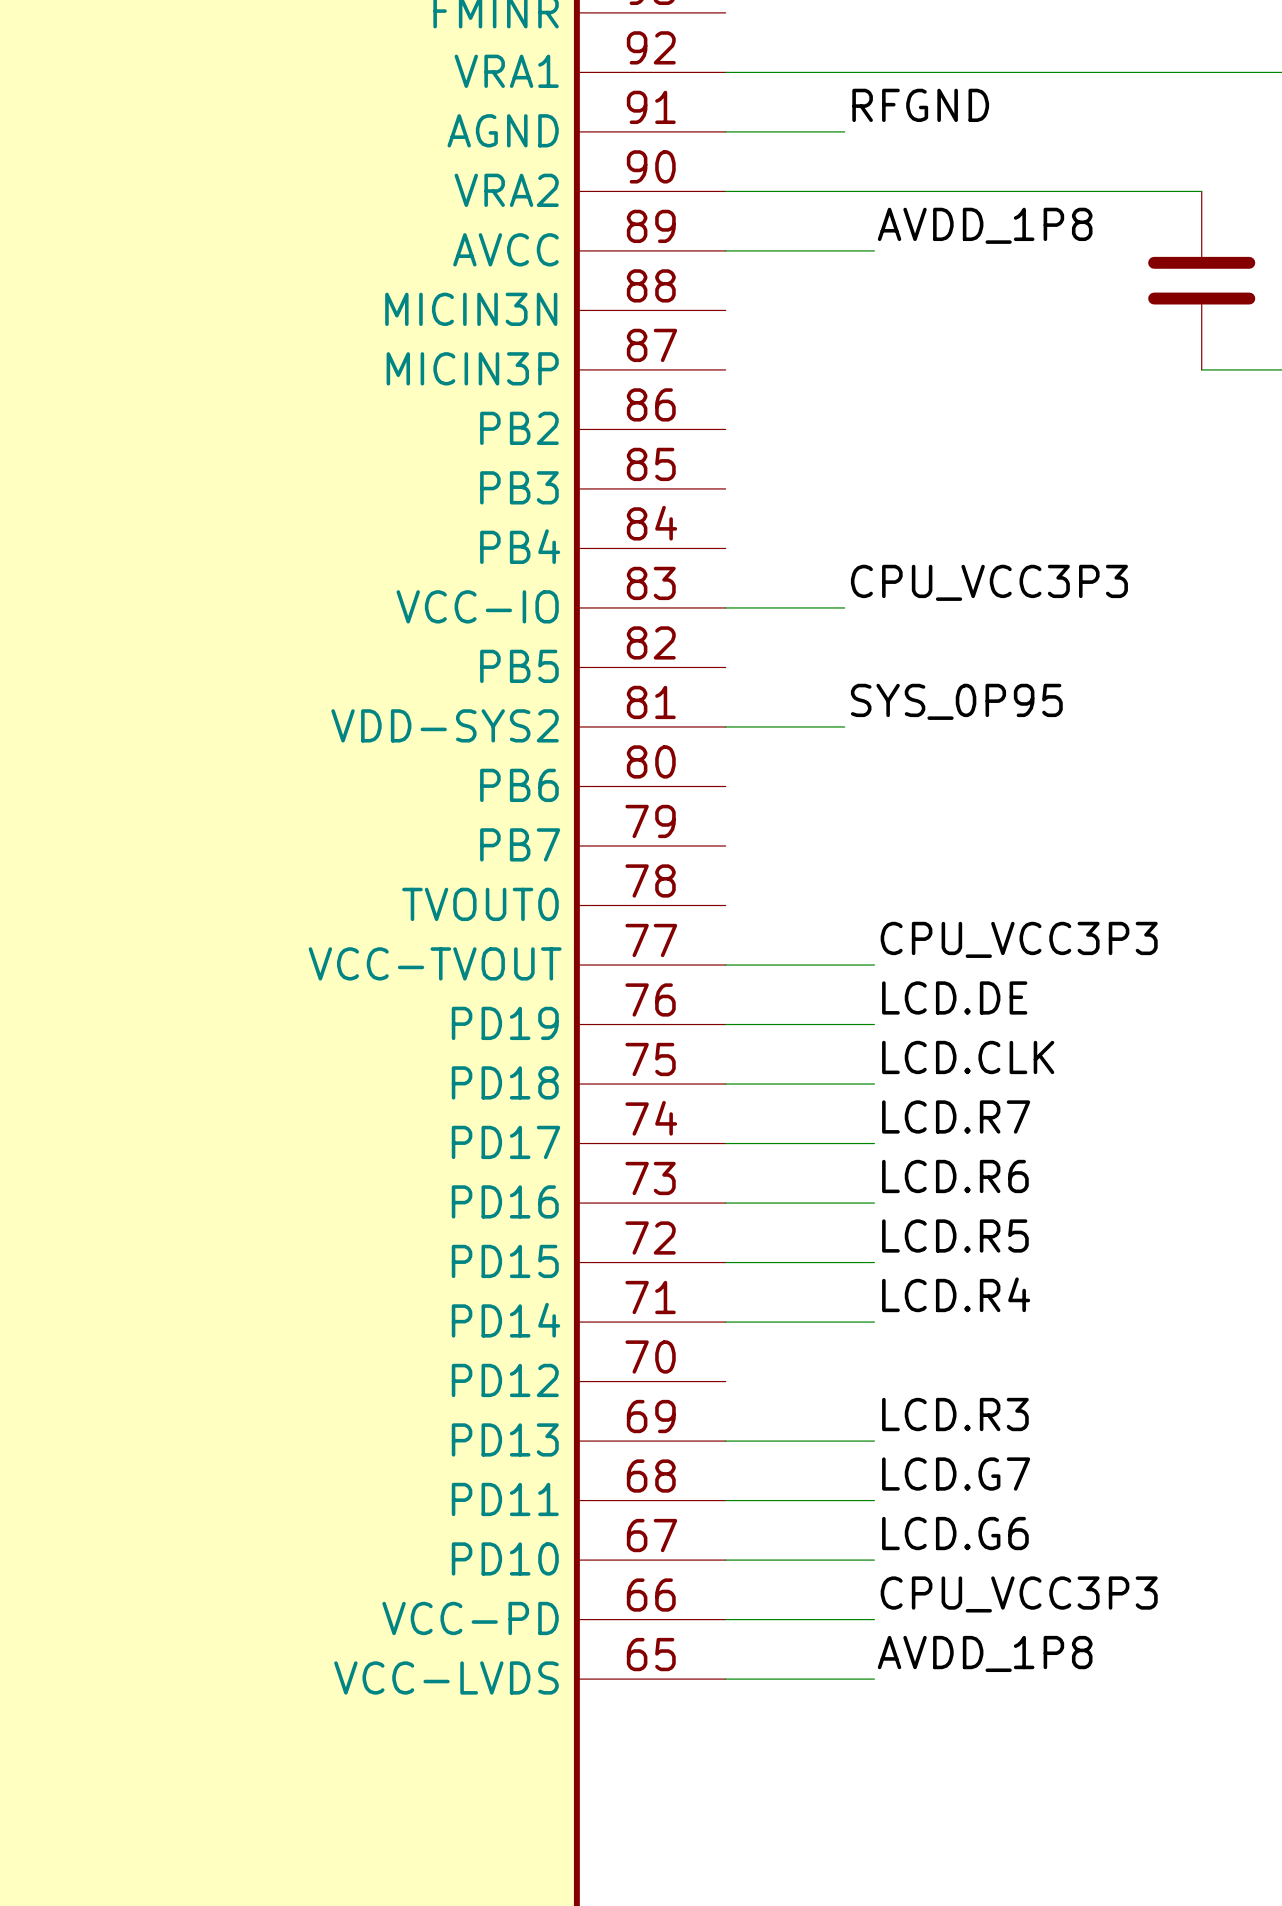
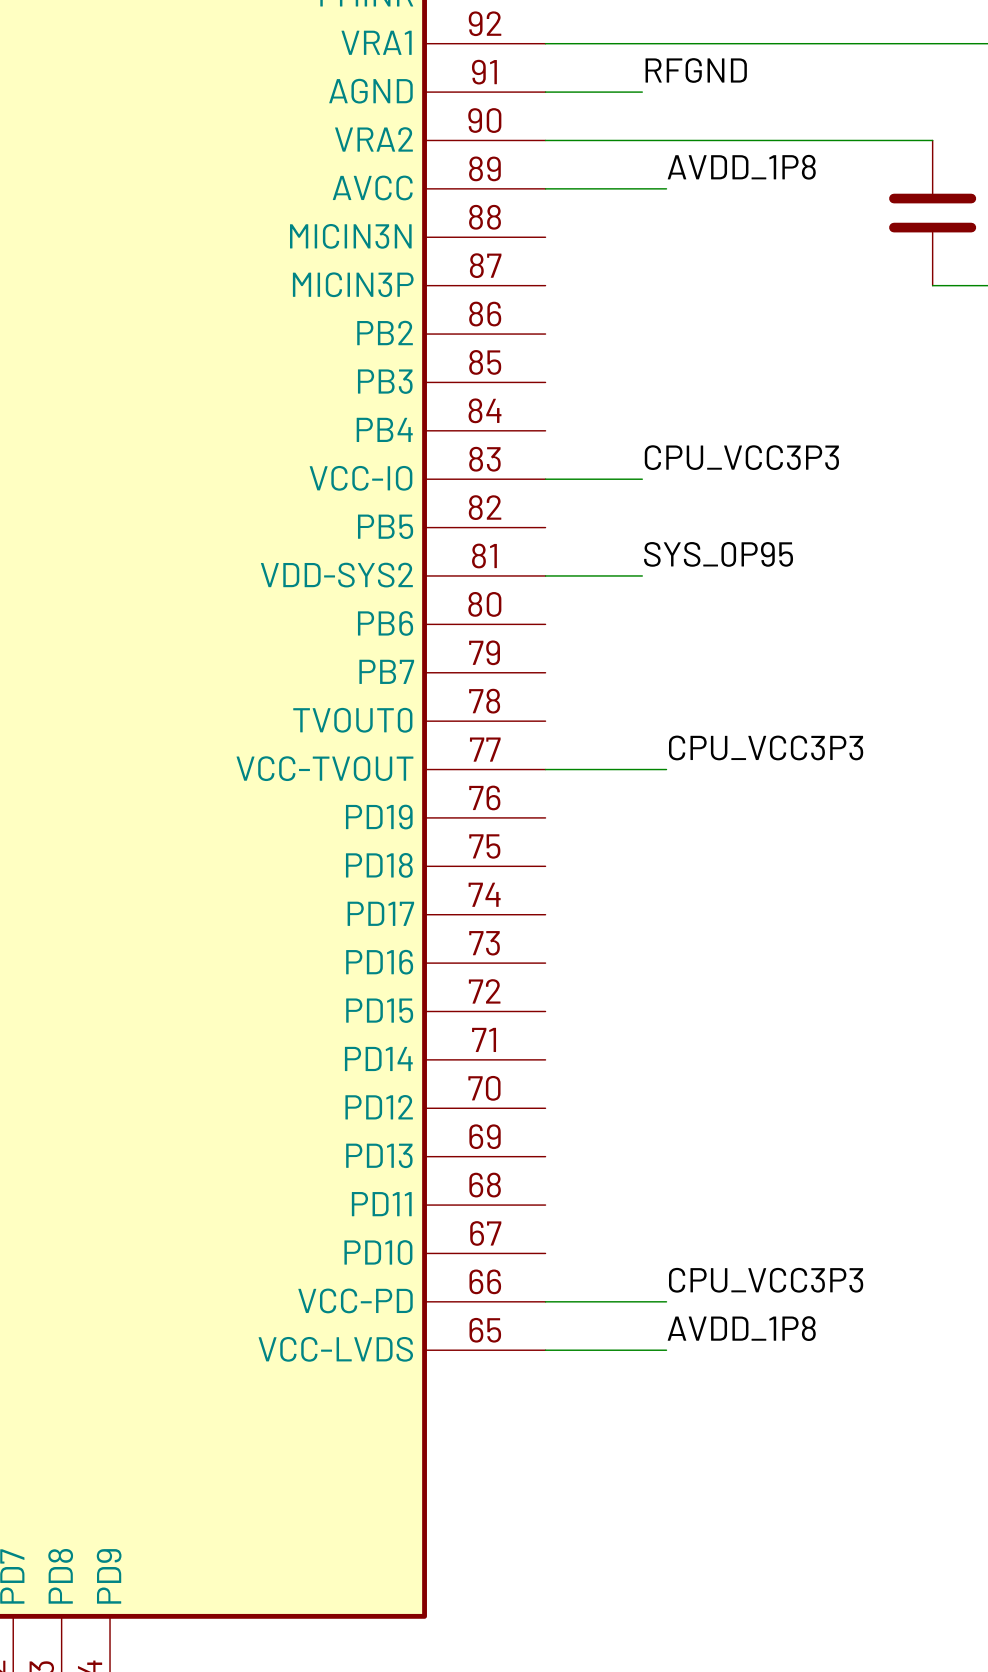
label: LCD.DE (954, 997) -> none
wire: (725, 1024) (874, 1024) -> none
label: LCD.CLK (968, 1057) -> none
wire: (725, 1084) (874, 1084) -> none
label: LCD.R7 (956, 1116) -> none
wire: (725, 1143) (874, 1143) -> none
label: LCD.R6 (955, 1176) -> none
wire: (725, 1203) (874, 1203) -> none
label: LCD.R5 (955, 1235) -> none
wire: (725, 1262) (874, 1262) -> none
label: LCD.R4 (956, 1294) -> none
wire: (725, 1322) (874, 1322) -> none
label: LCD.R3 (955, 1414) -> none
wire: (725, 1441) (874, 1441) -> none
label: LCD.G7 (956, 1474) -> none
wire: (725, 1500) (874, 1500) -> none
label: LCD.G6 (955, 1533) -> none
wire: (725, 1560) (874, 1560) -> none

